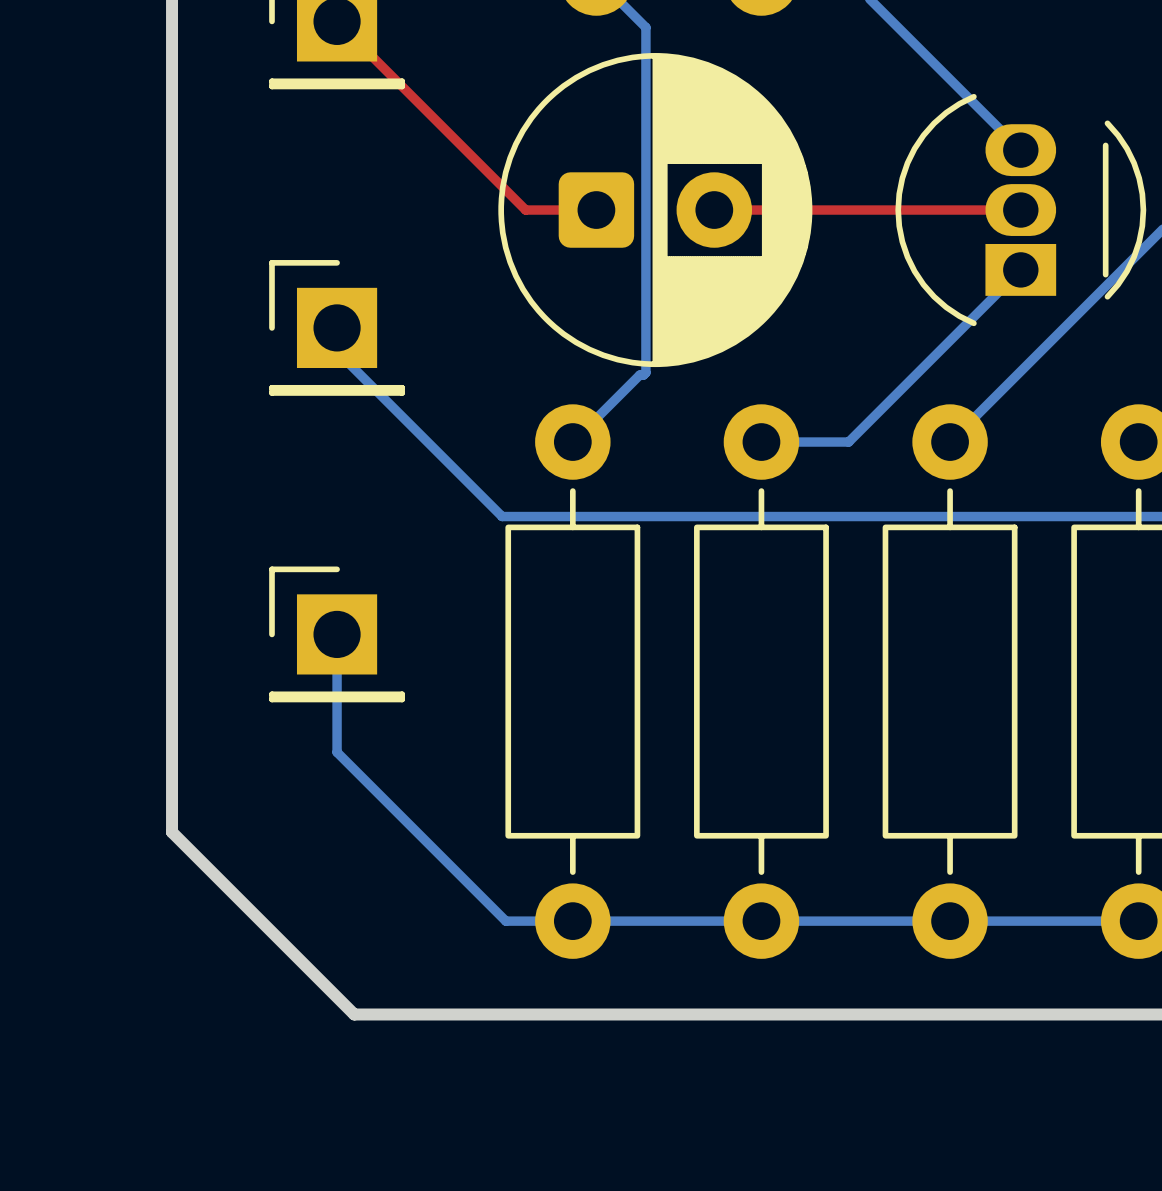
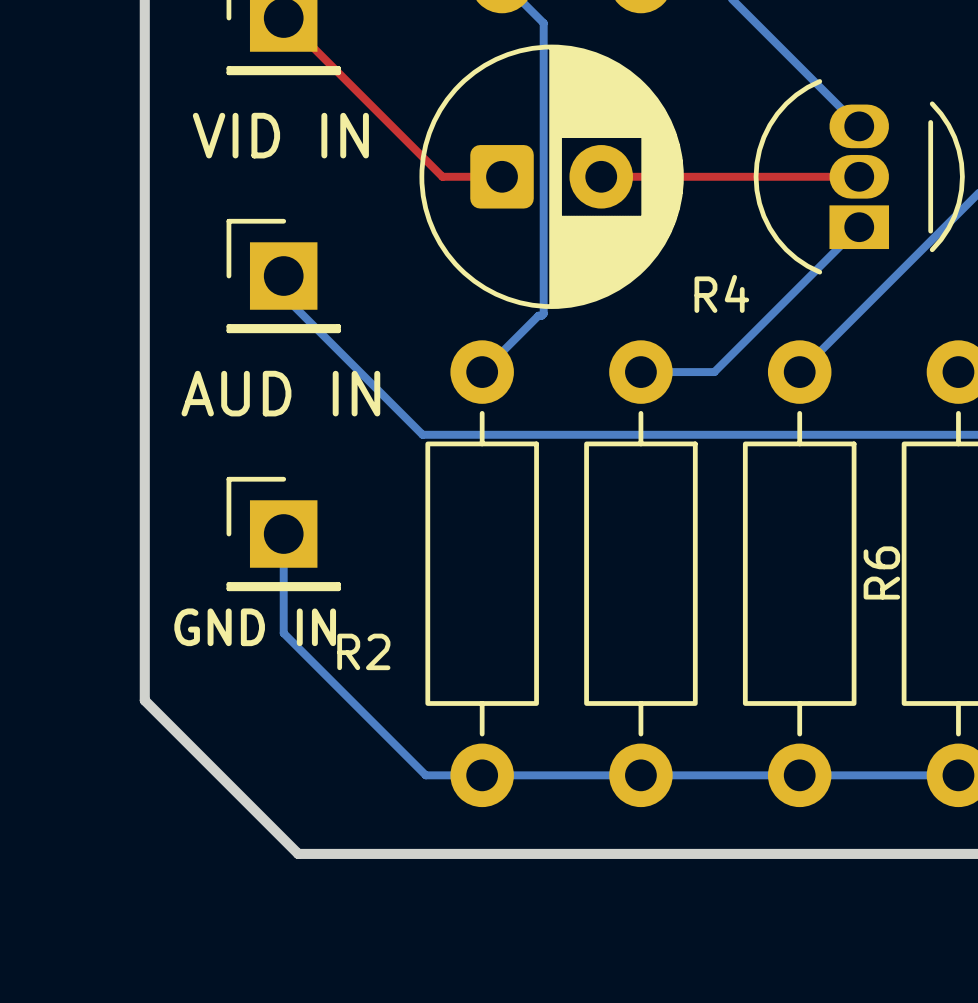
part value: none -> VID IN (280, 135)
text: none -> R4 (721, 293)
part value: none -> AUD IN (280, 393)
text: none -> R6 (881, 572)
part value: none -> GND IN (255, 627)
text: none -> R2 (363, 651)

